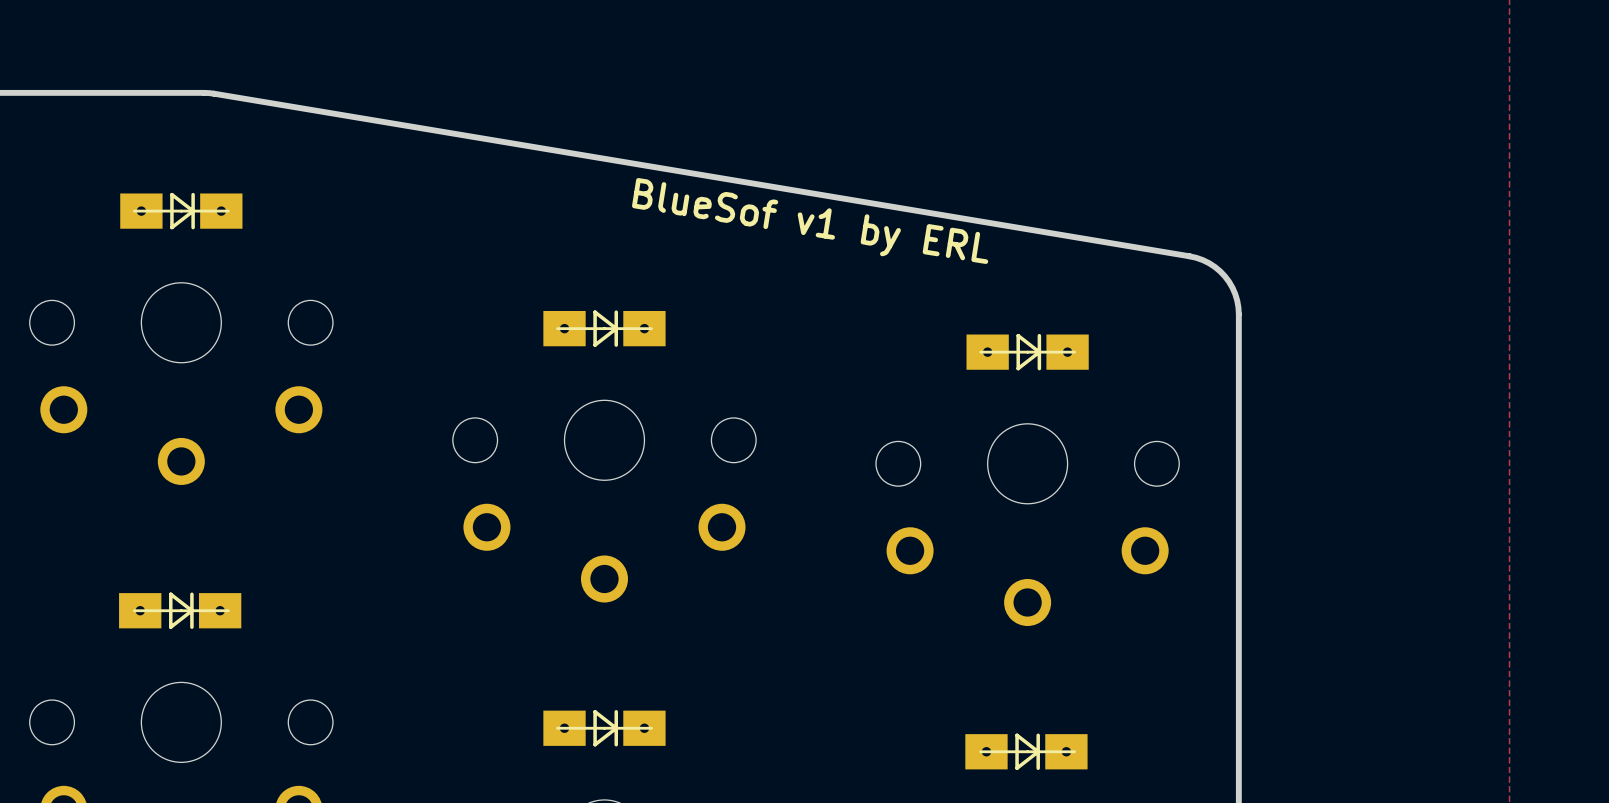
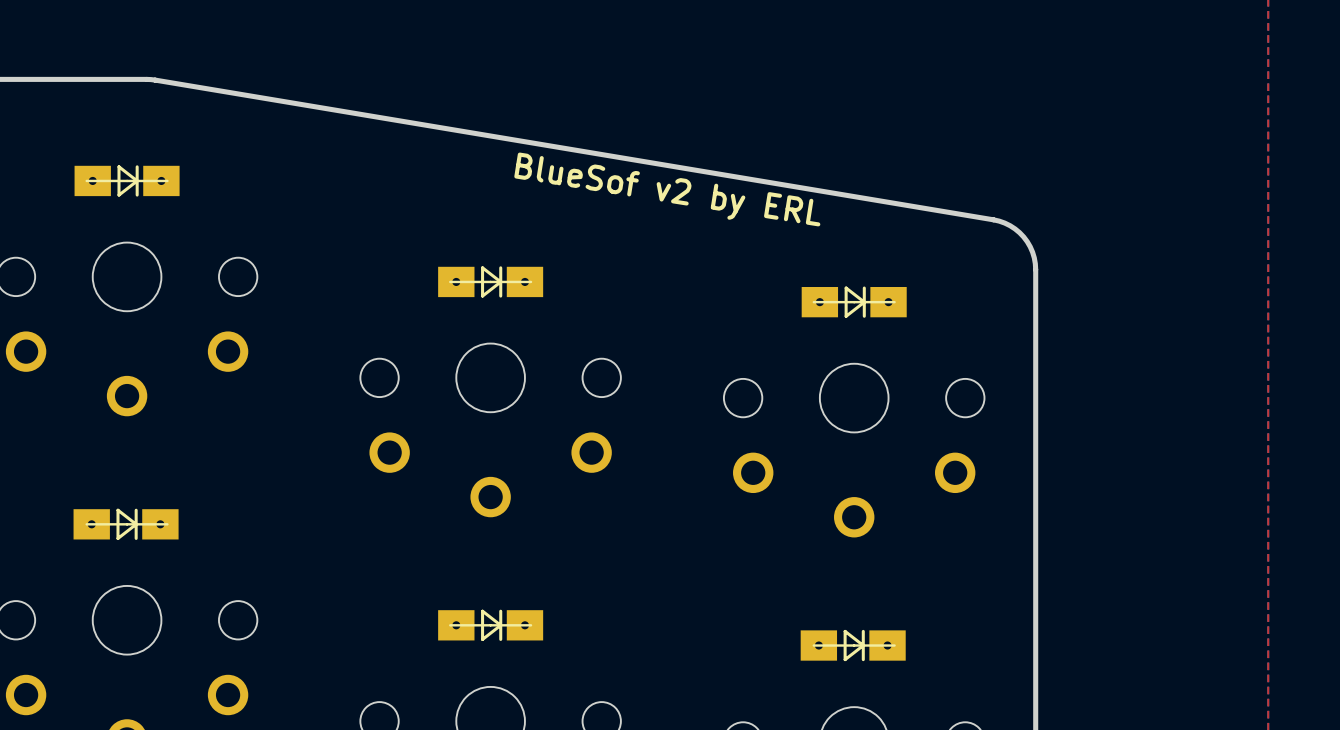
text: BlueSof v1 by ERL (810, 221) -> BlueSof v2 by ERL (667, 189)

